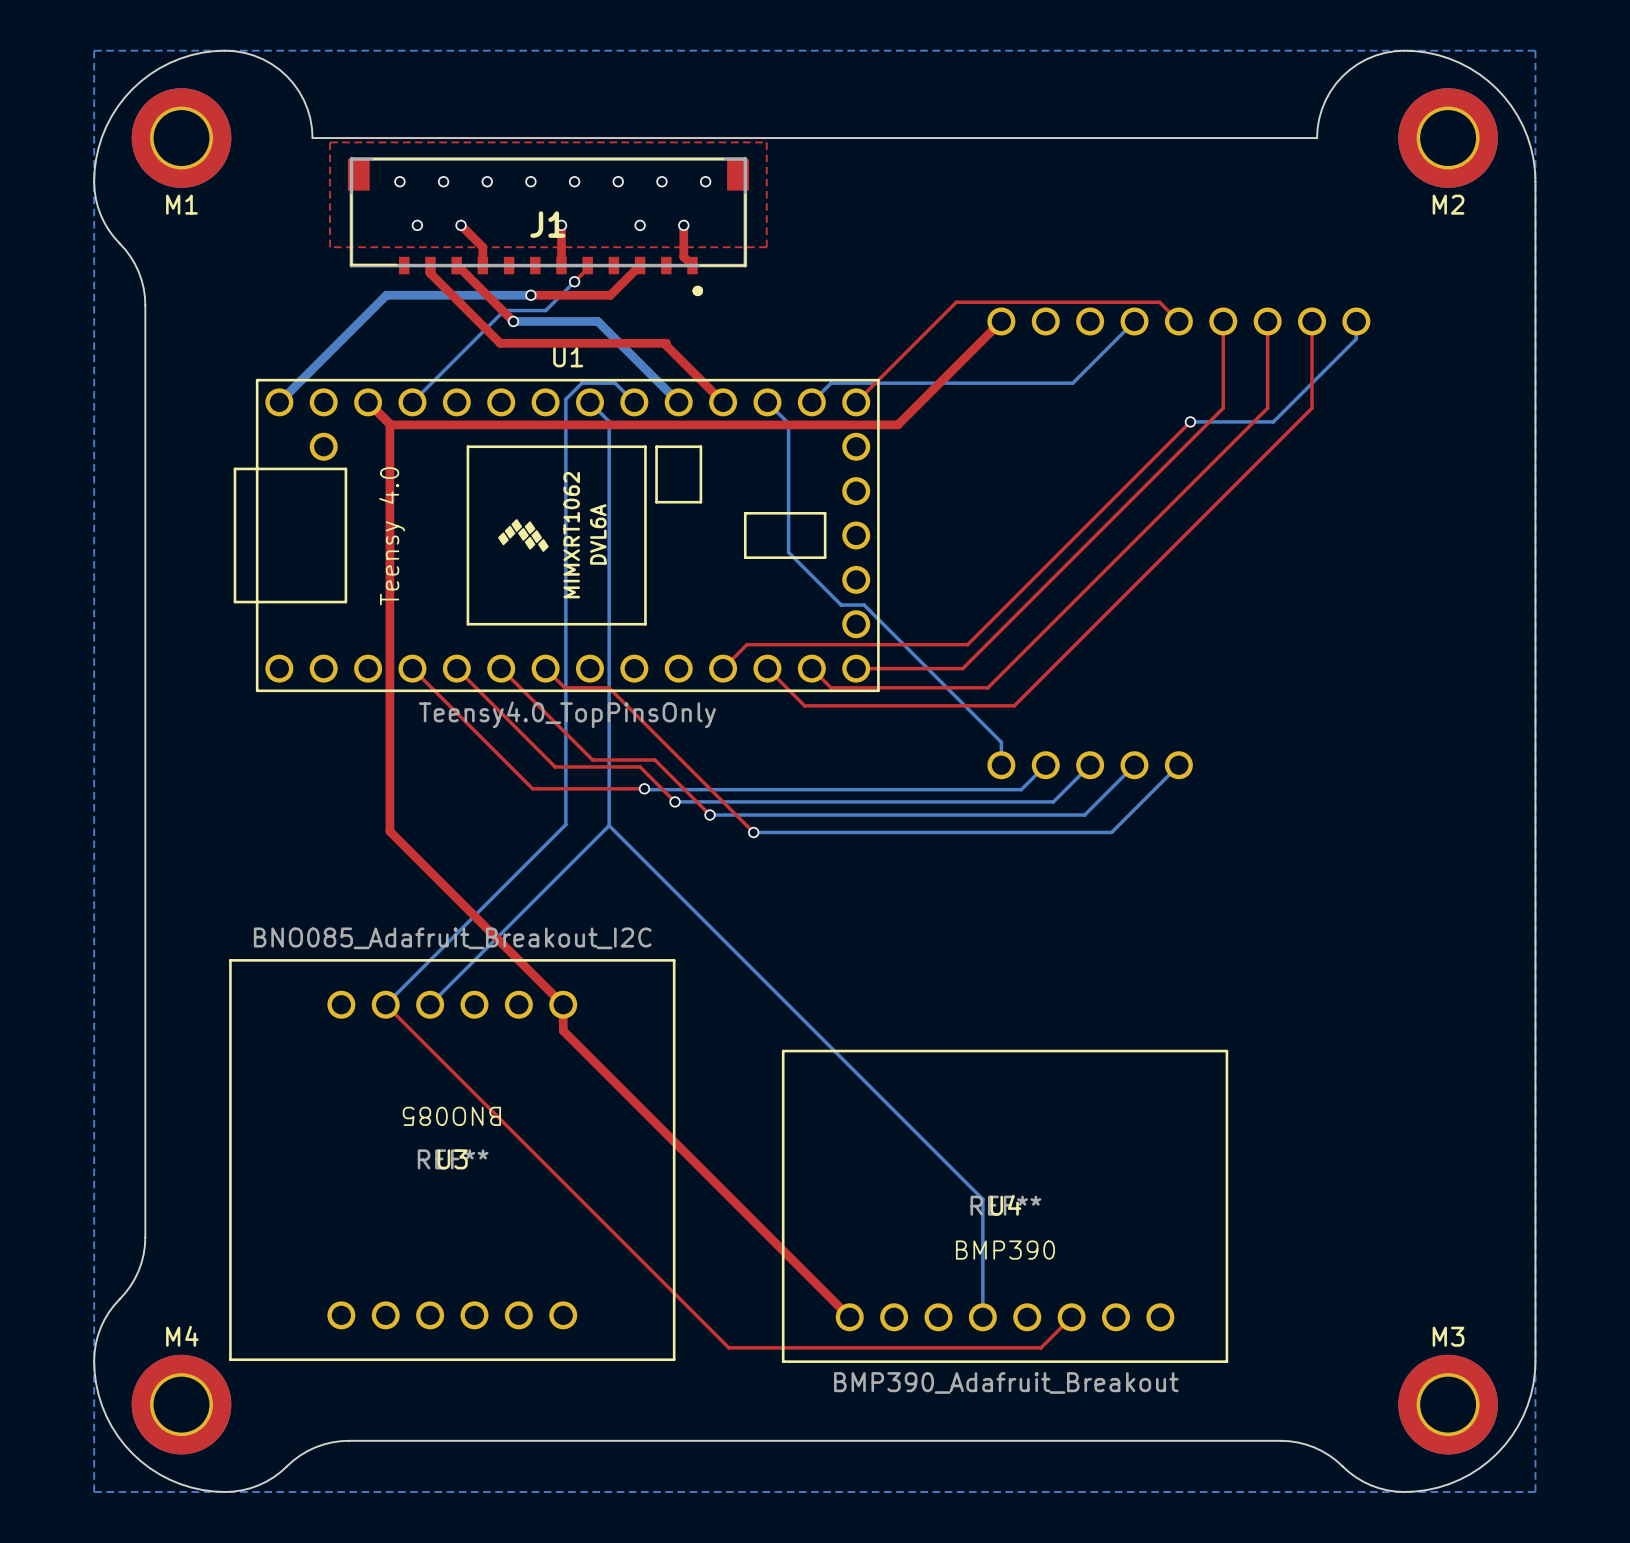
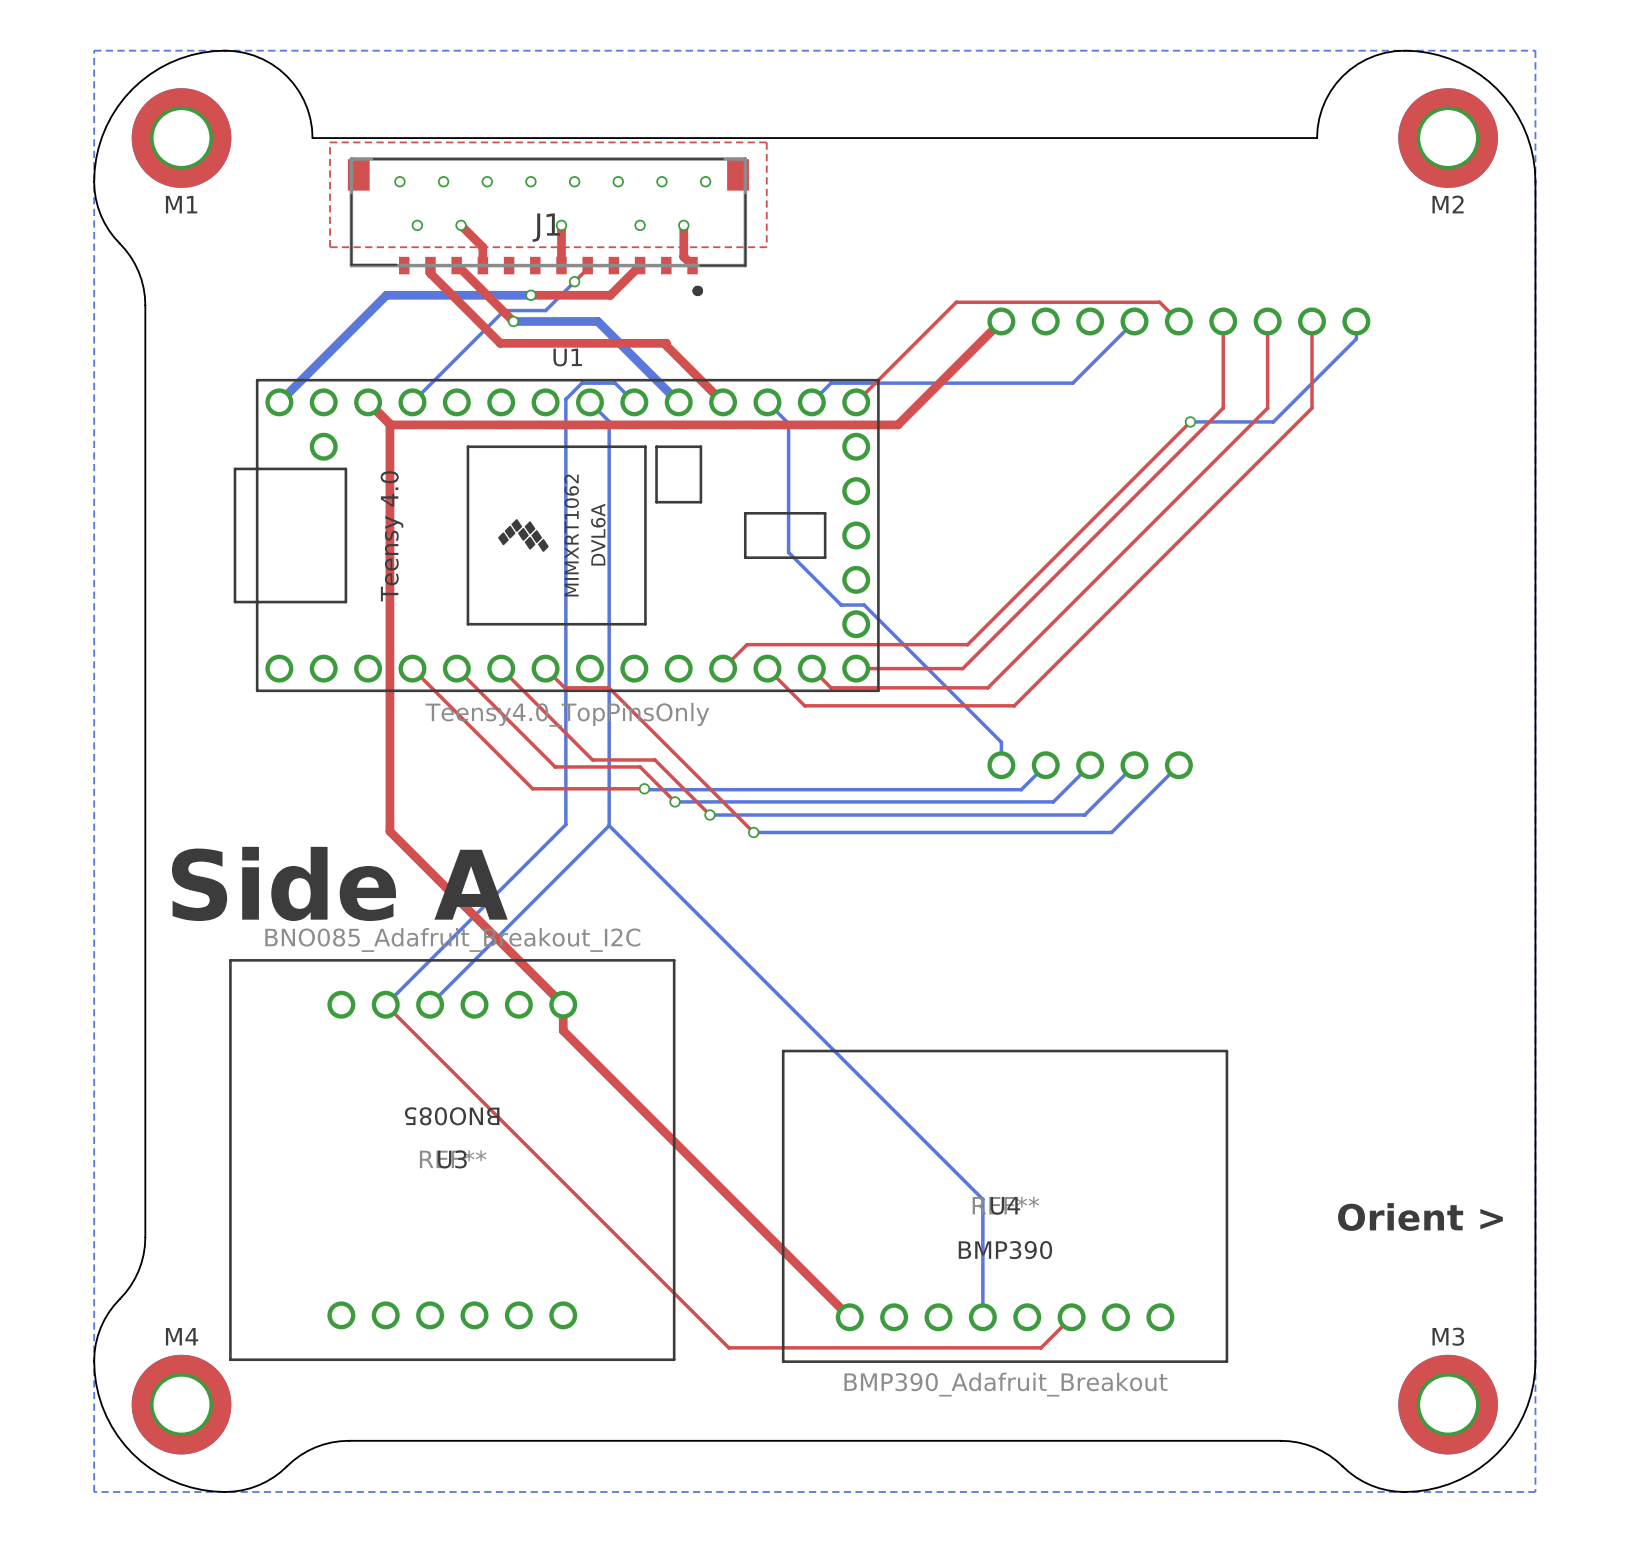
text: none -> Side A (339, 883)
text: none -> Orient > (1420, 1216)

